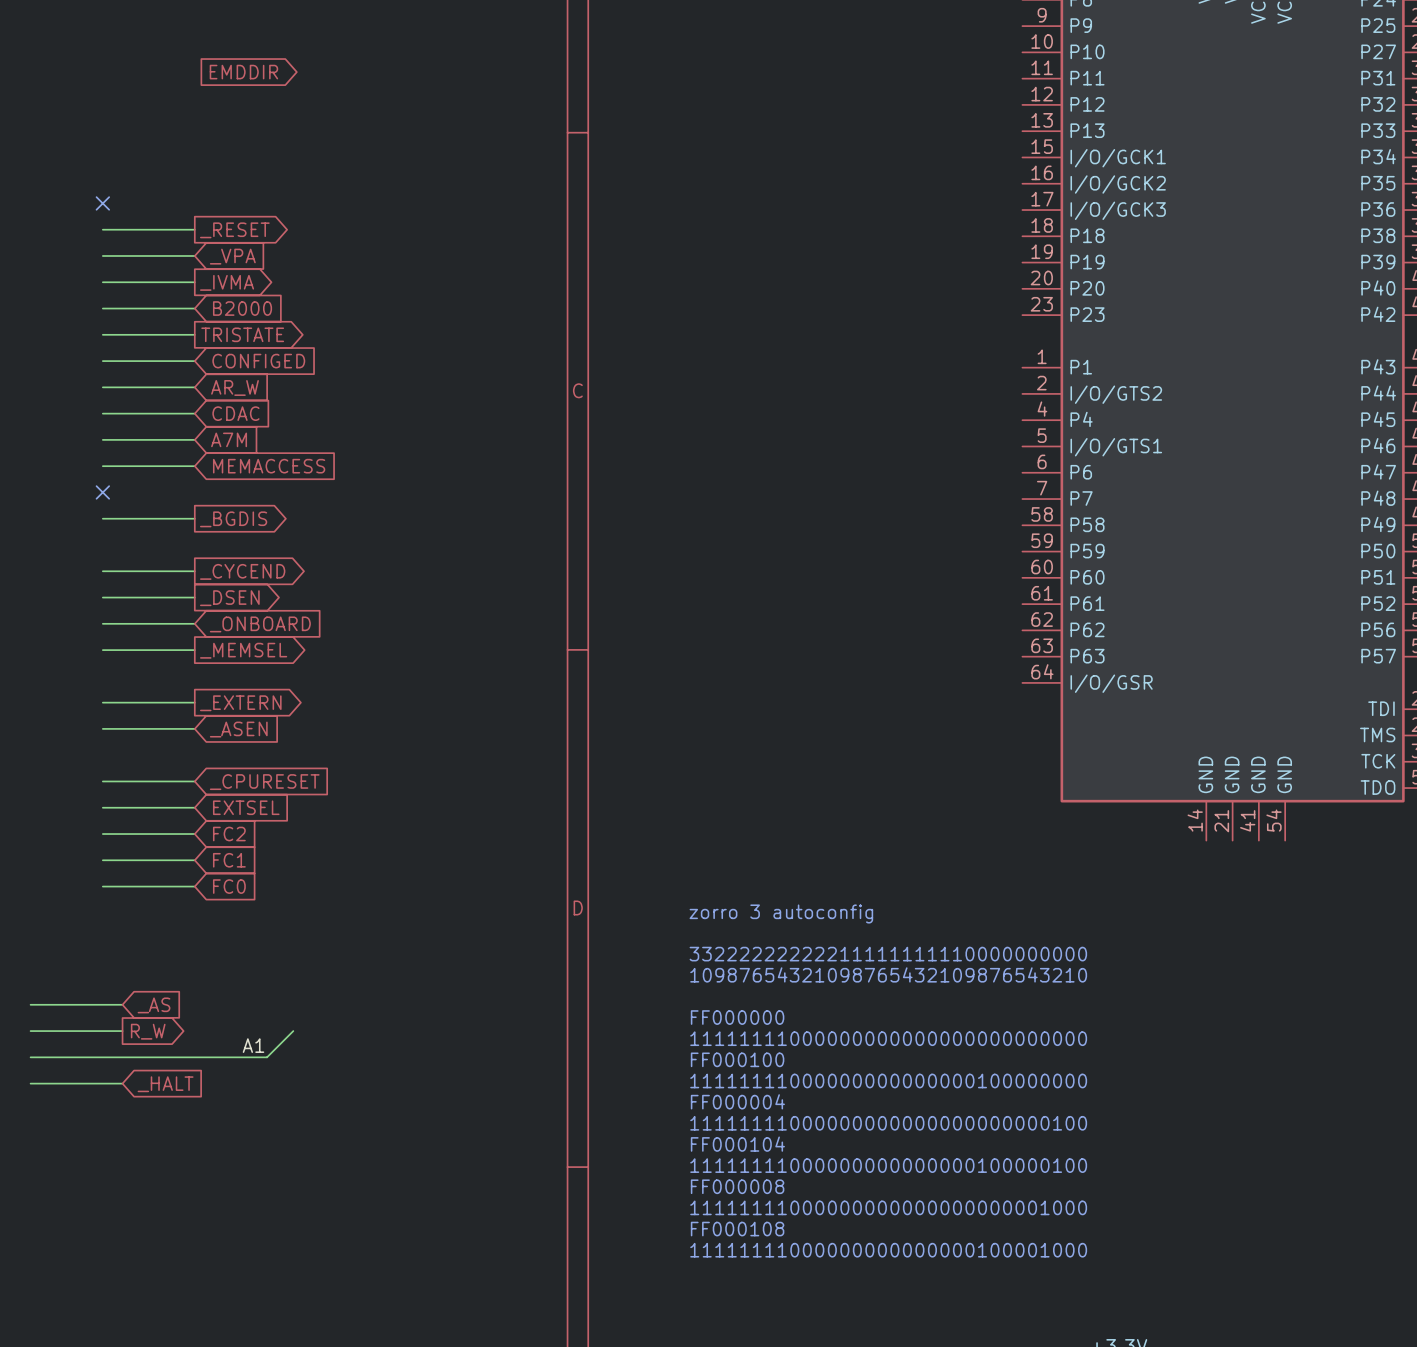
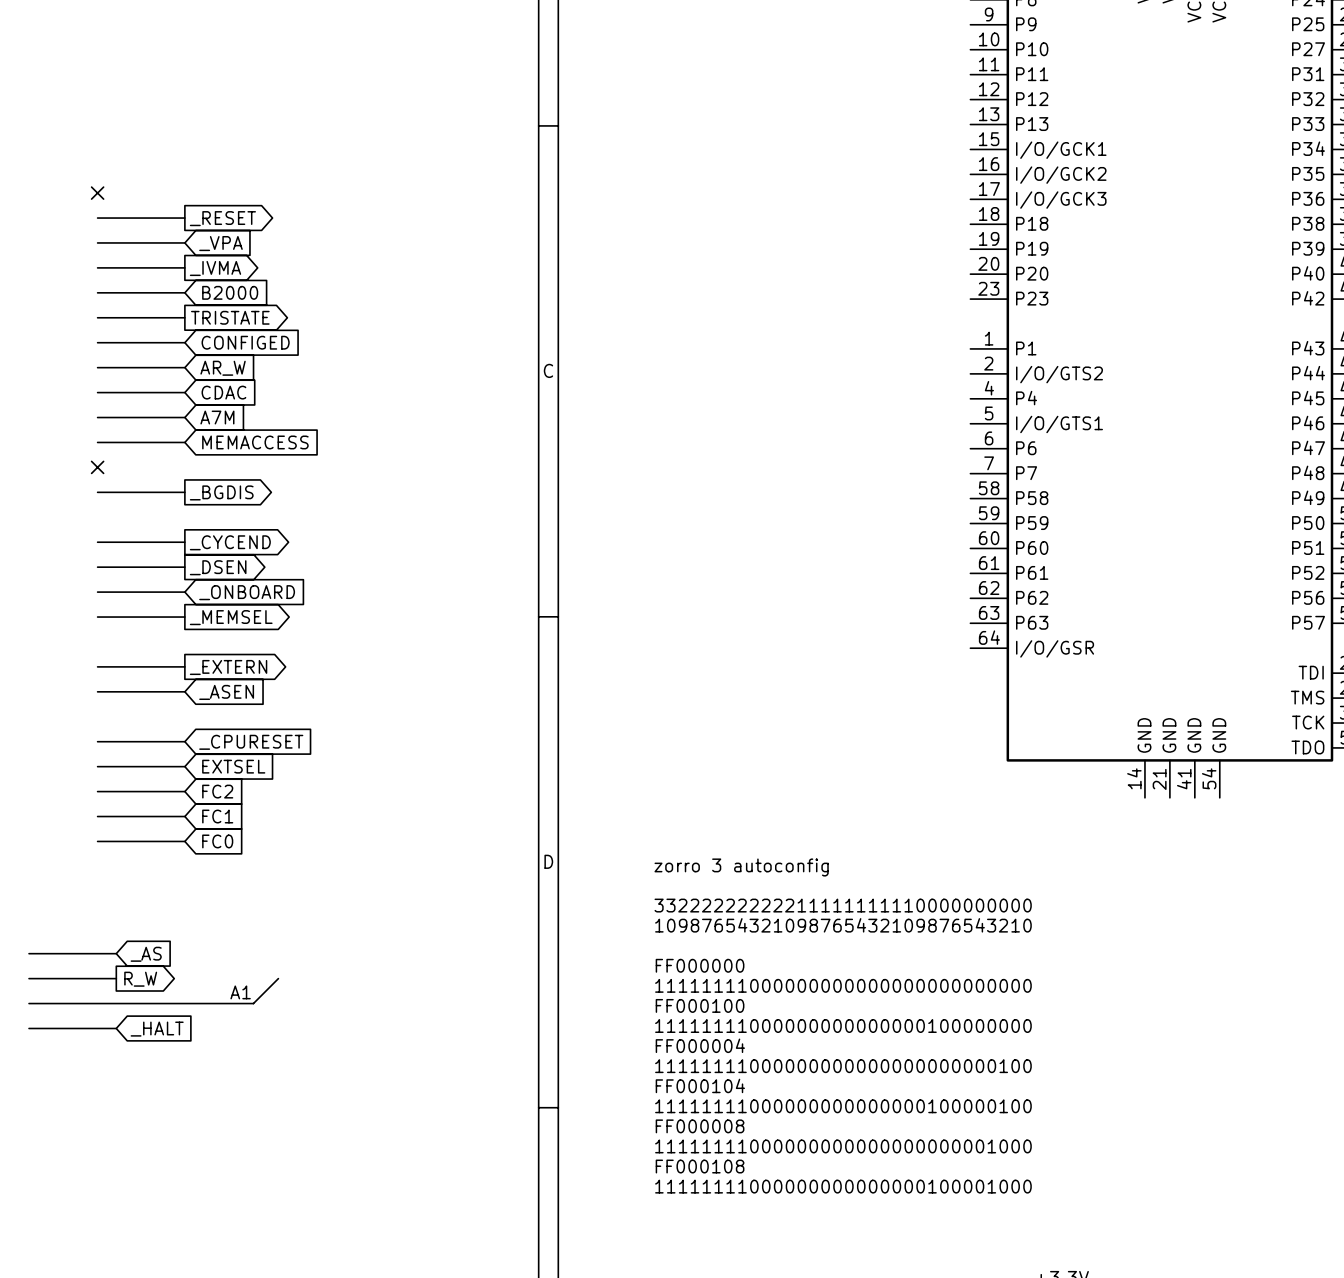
global label: EMDDIR (243, 72) -> none

